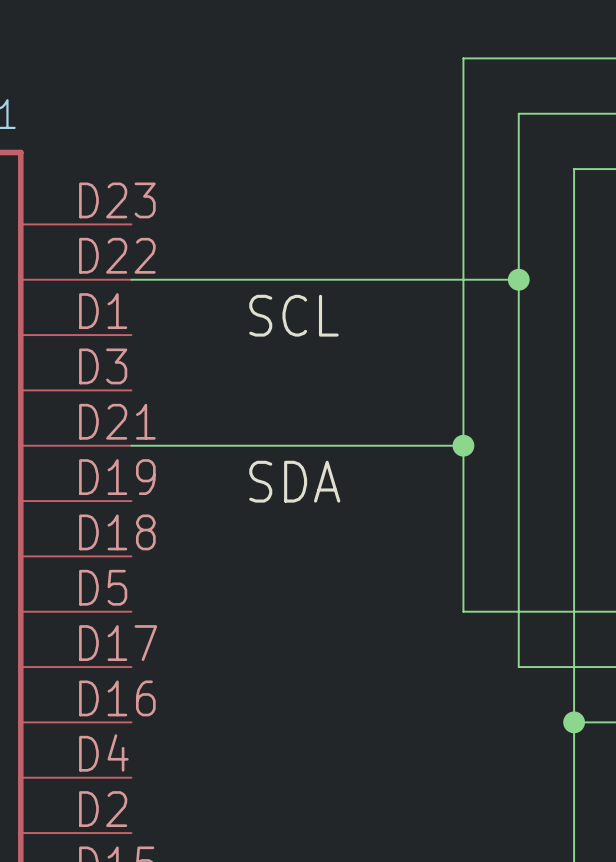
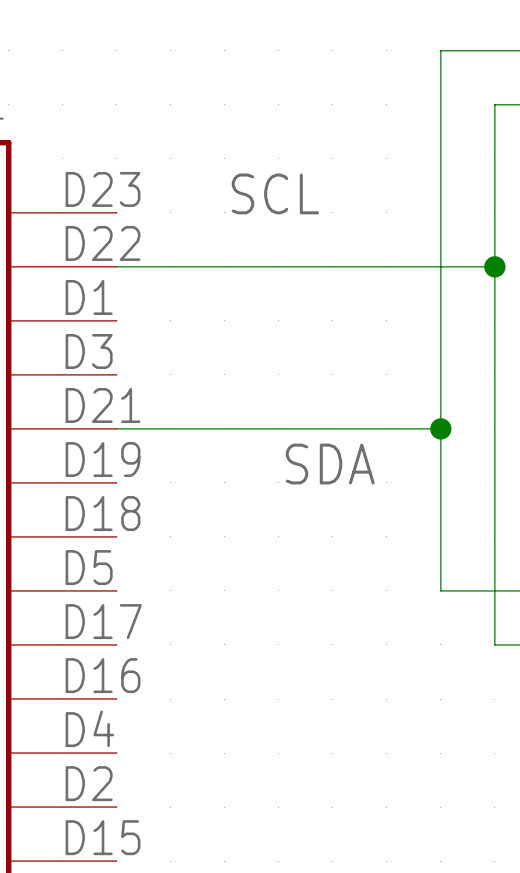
label position: SCL (293, 315) -> SCL (275, 193)
label position: SDA (294, 481) -> SDA (330, 464)

